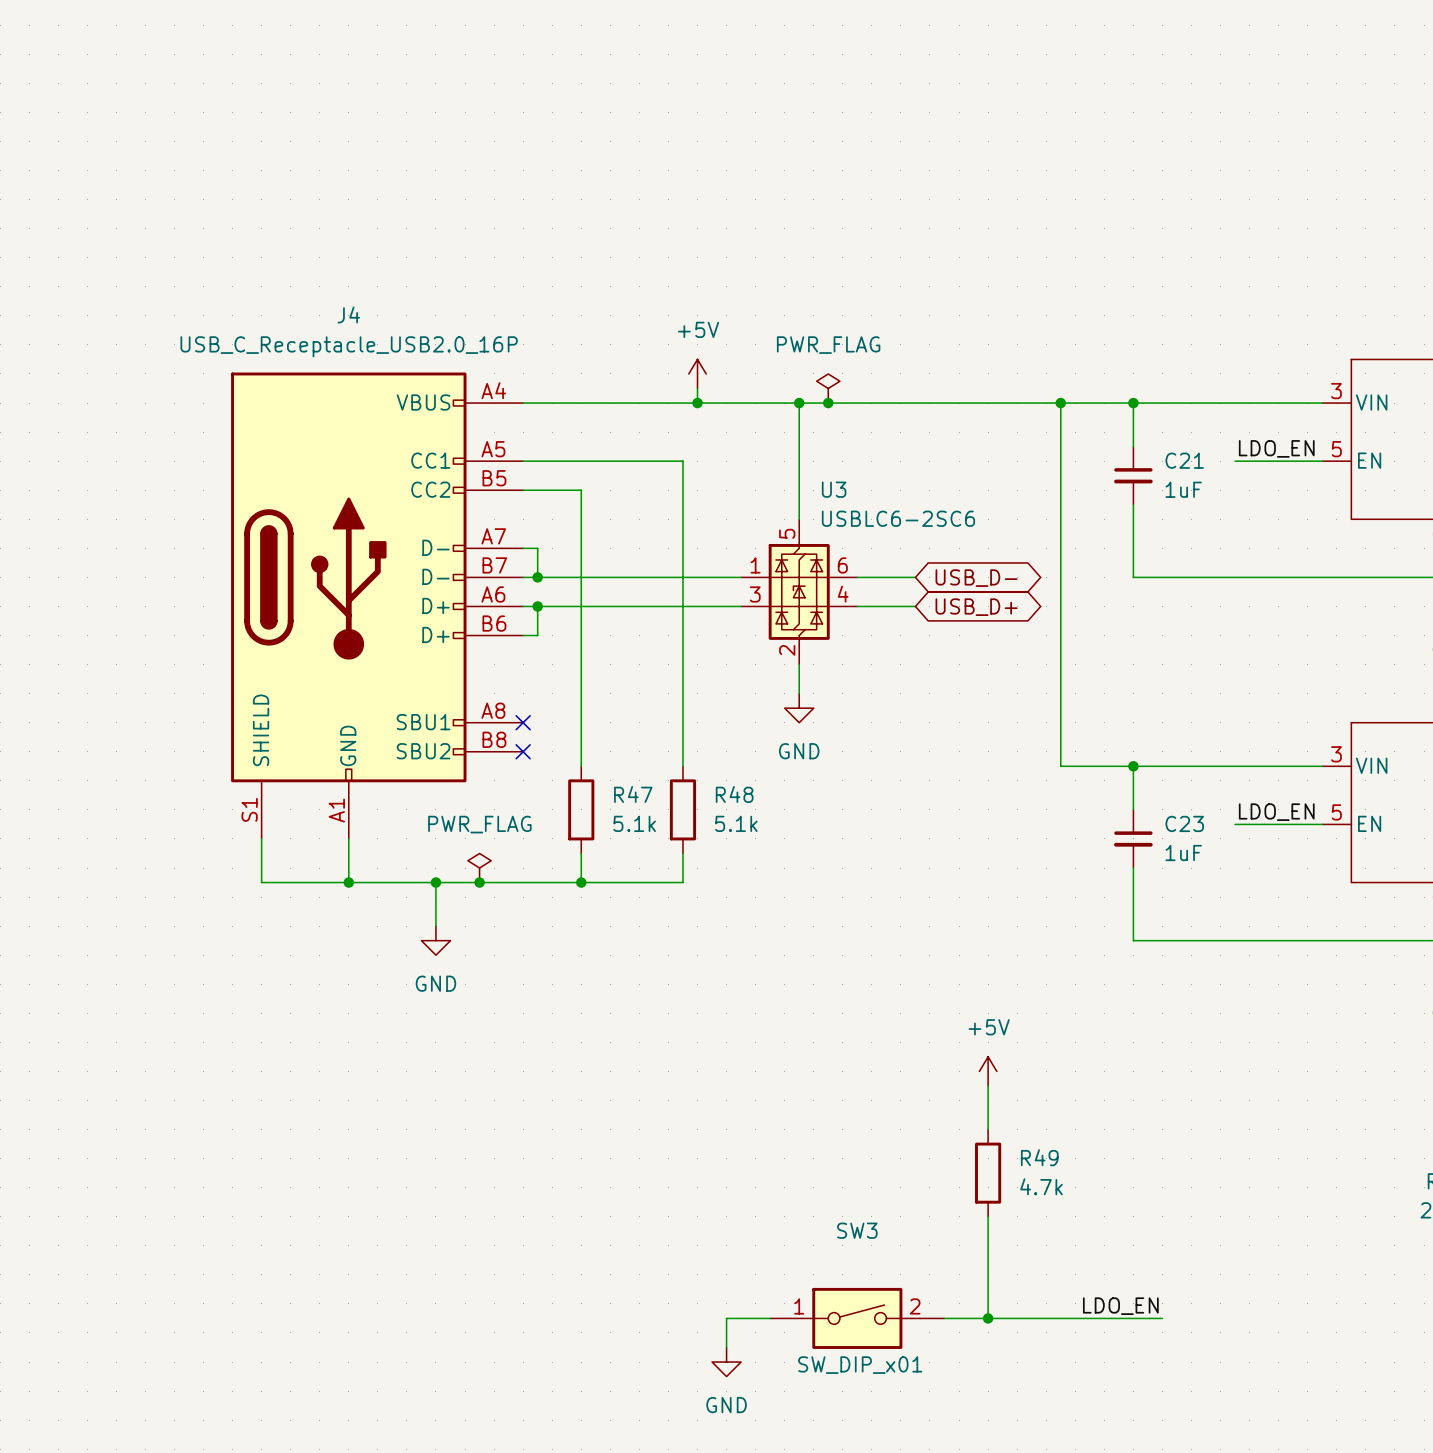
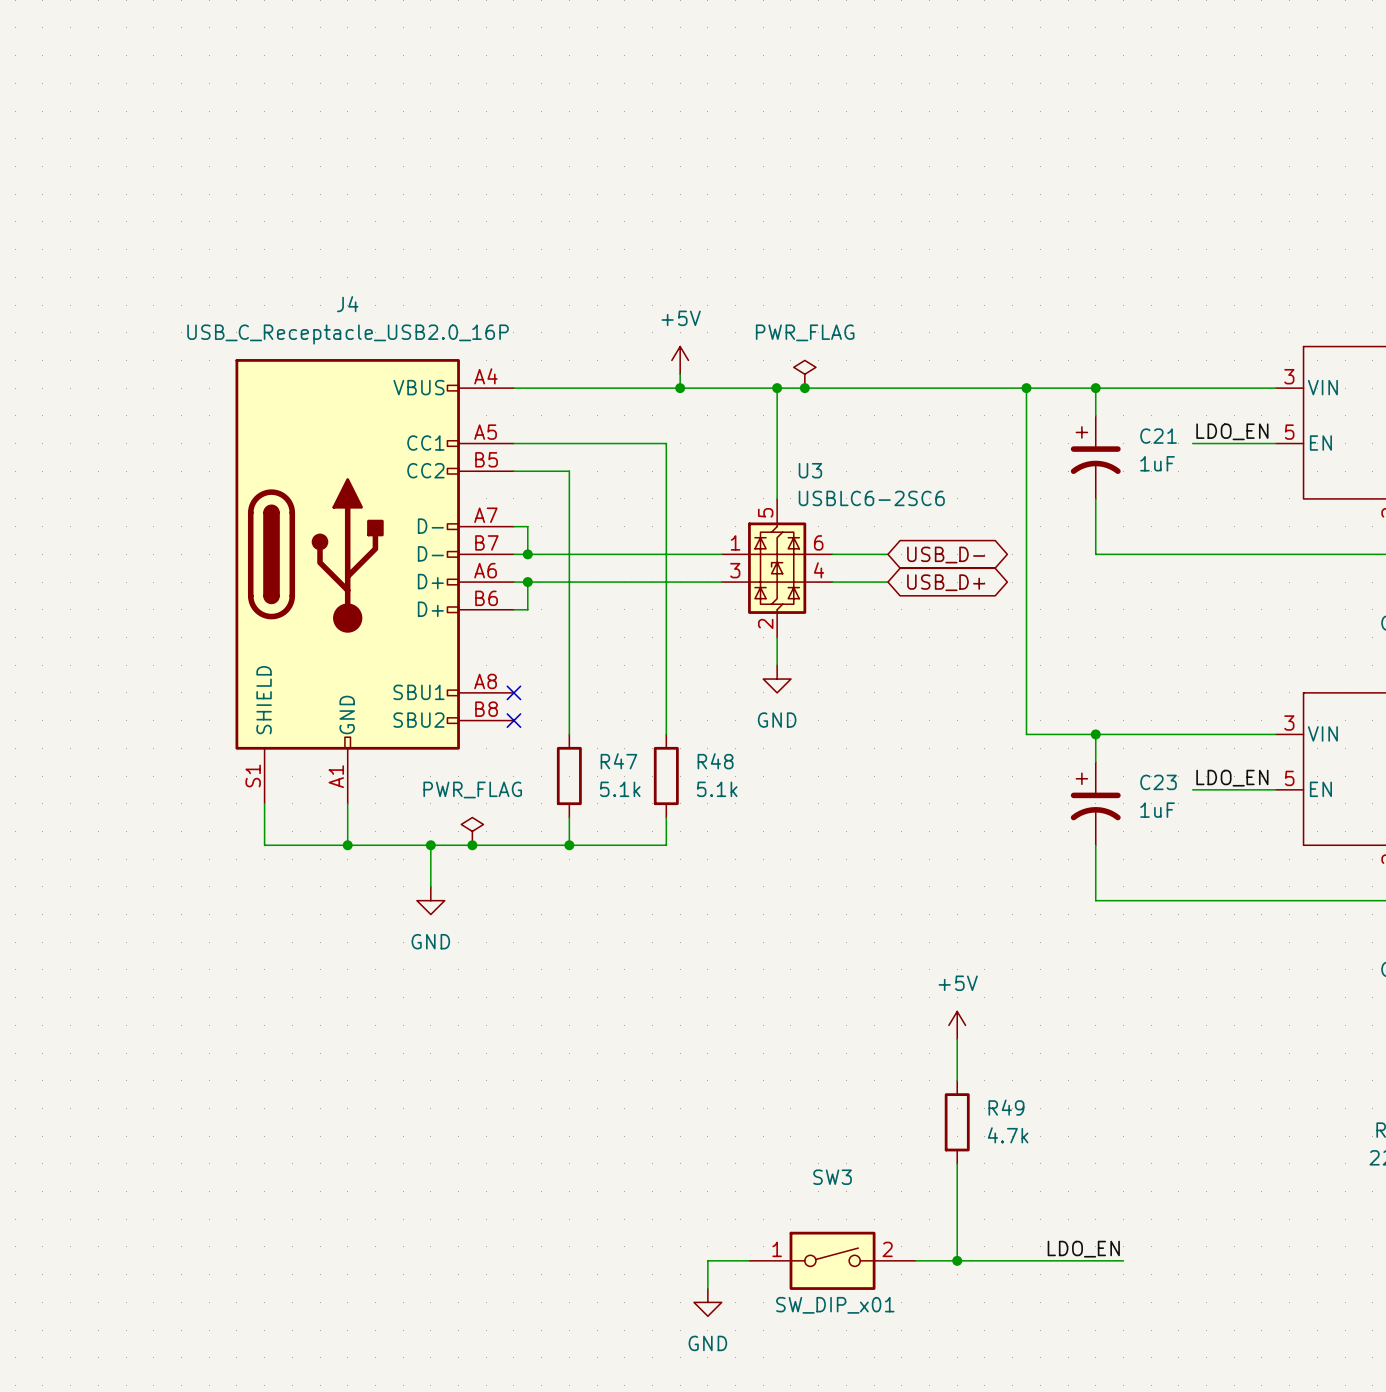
C21 symbol: [1114, 446, 1153, 505] -> [1070, 415, 1121, 499]
C23 symbol: [1114, 809, 1153, 869] -> [1070, 762, 1121, 846]

